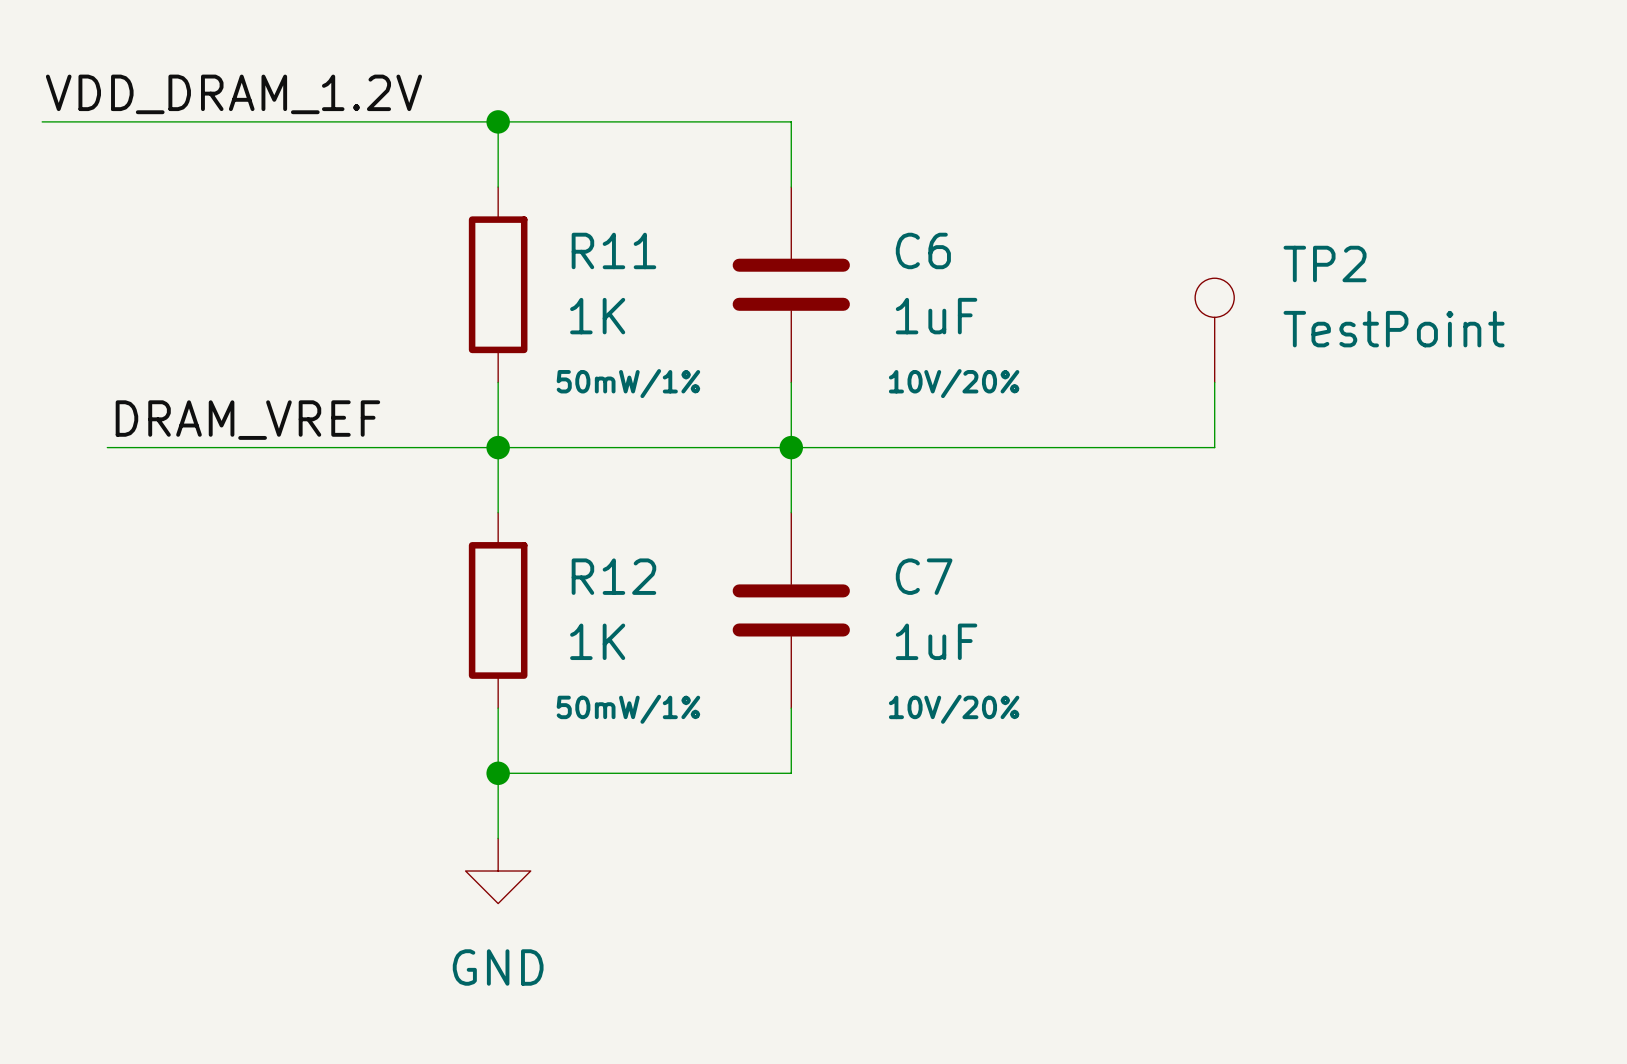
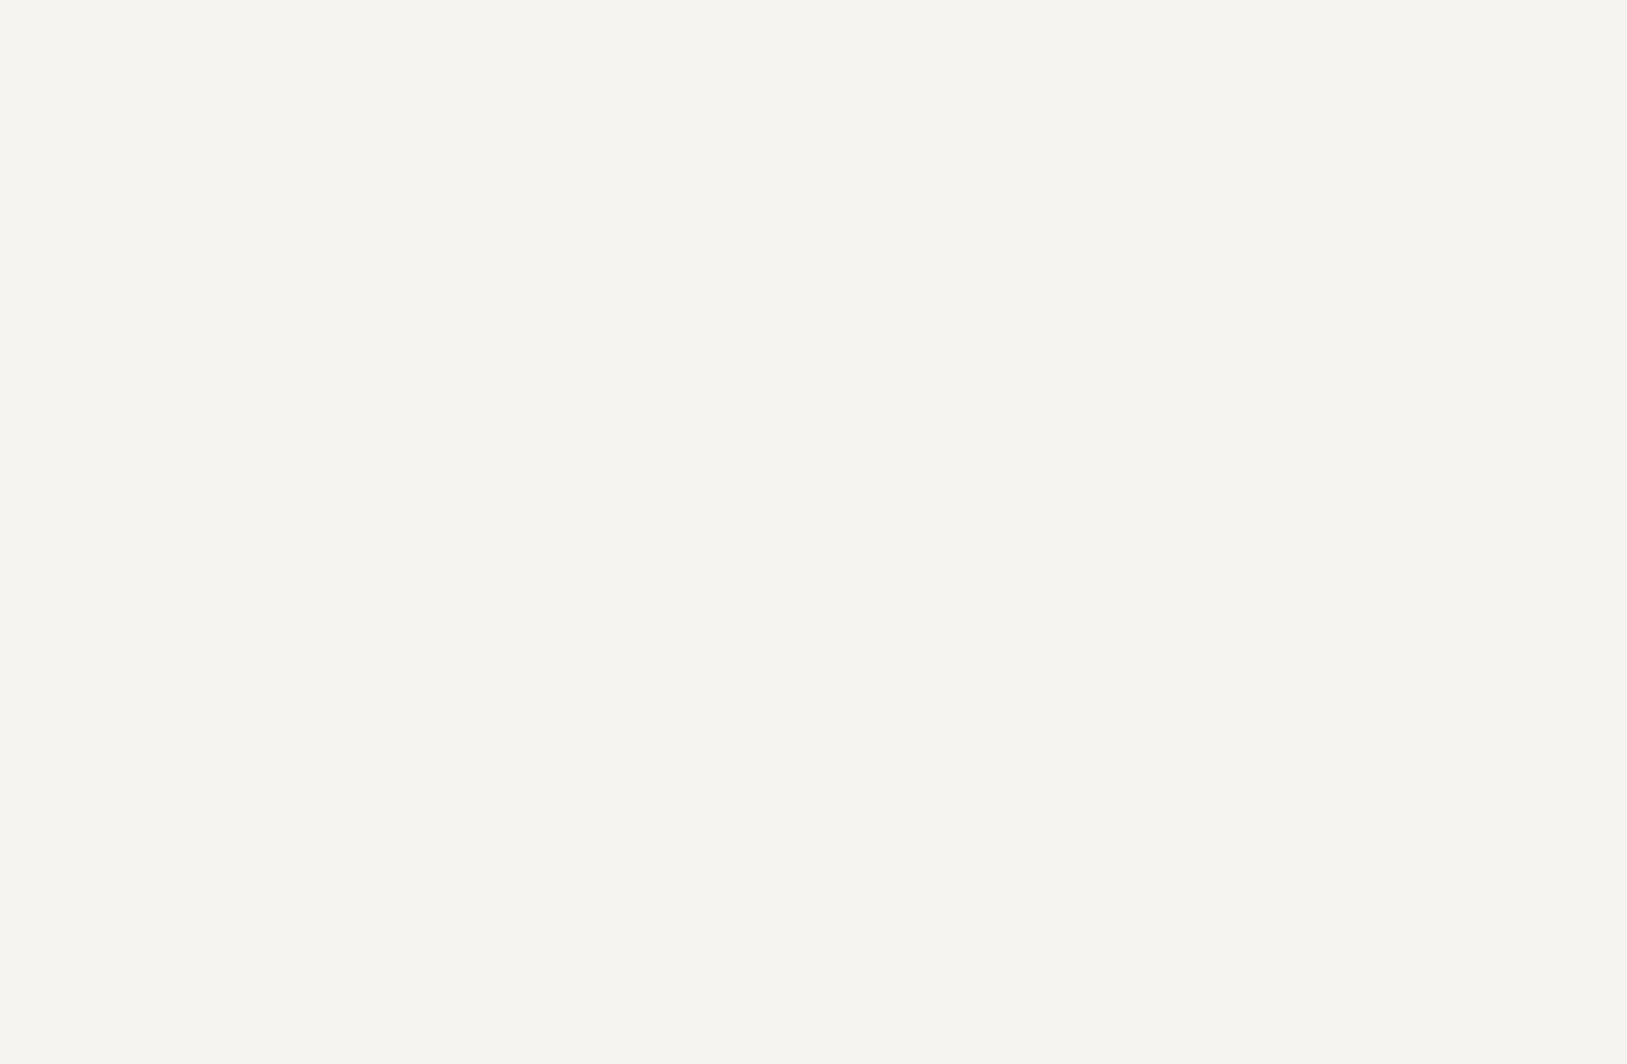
label: VDD_DRAM_1.2V (233, 94) -> none
wire: (42, 121) (791, 121) (791, 187) -> none
wire: (498, 121) (498, 187) -> none
junction: (498, 121) -> none
R11: 1K (498, 284) -> none
C6: 1uF (791, 284) -> none
TP2: TestPoint (1214, 330) -> none
wire: (498, 382) (498, 512) -> none
wire: (791, 382) (791, 512) -> none
wire: (1214, 382) (1214, 447) (107, 447) -> none
label: DRAM_VREF (247, 420) -> none
junction: (498, 447) -> none
junction: (791, 447) -> none
R12: 1K (498, 610) -> none
C7: 1uF (791, 610) -> none
wire: (498, 708) (498, 838) -> none
wire: (791, 708) (791, 773) (498, 773) -> none
junction: (498, 773) -> none
power symbol: GND (498, 871) -> none

